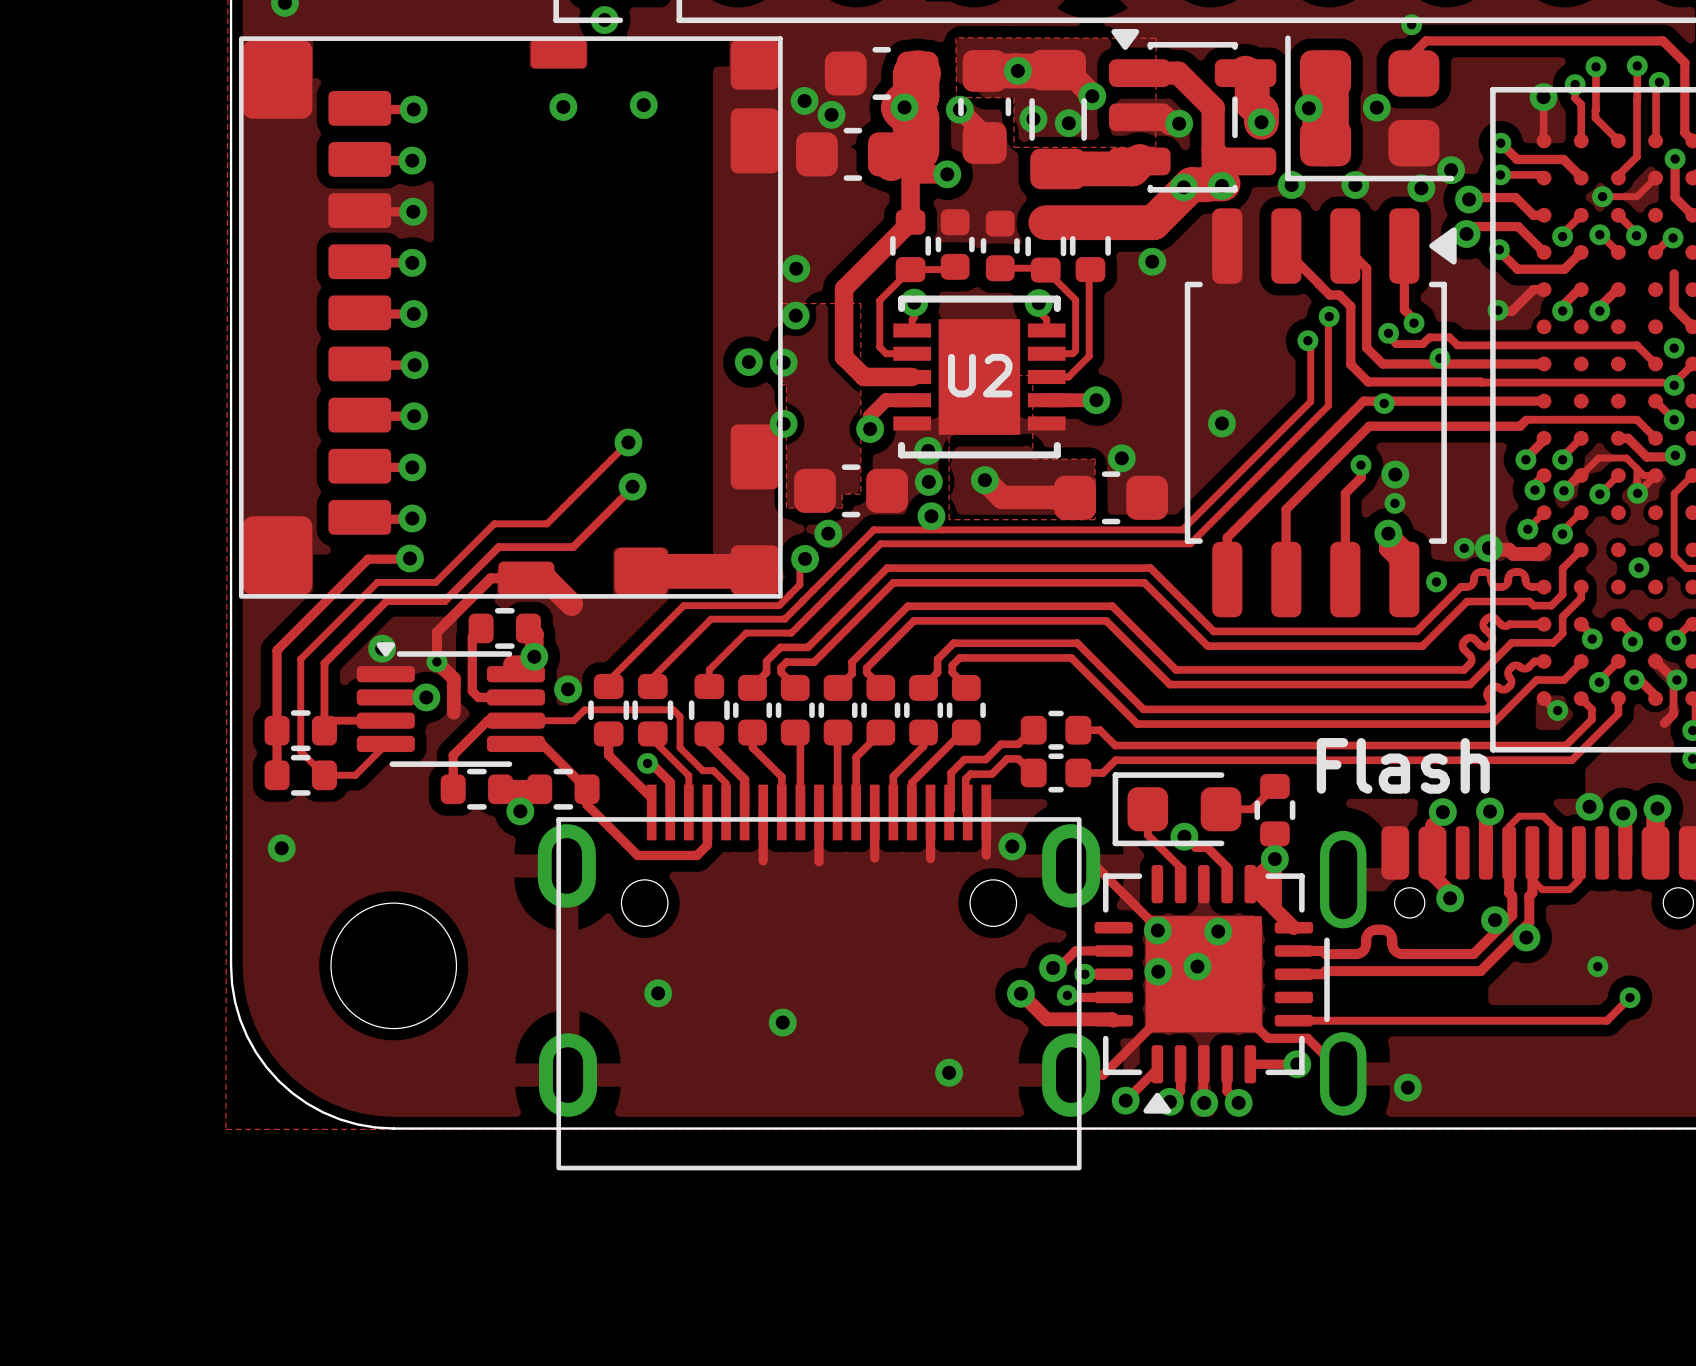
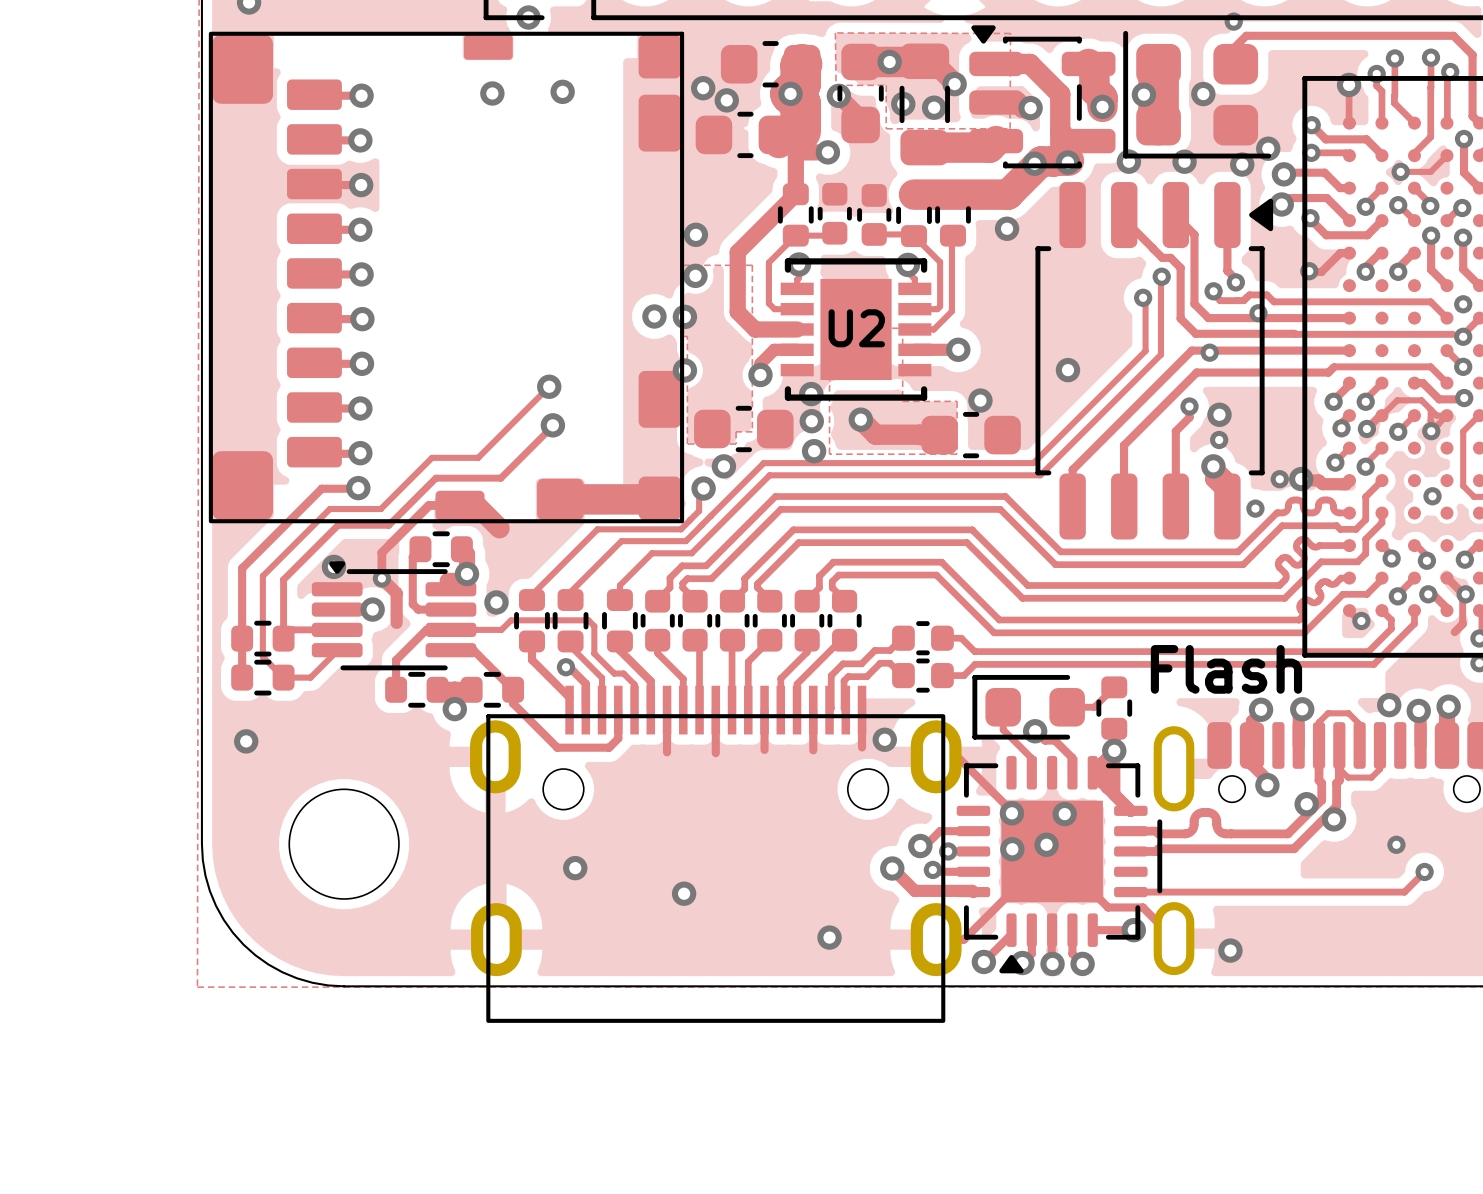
track: none -> (1431, 235) (1431, 269) (1446, 285)
via: none -> (1431, 235)
via: none -> (1463, 237)

